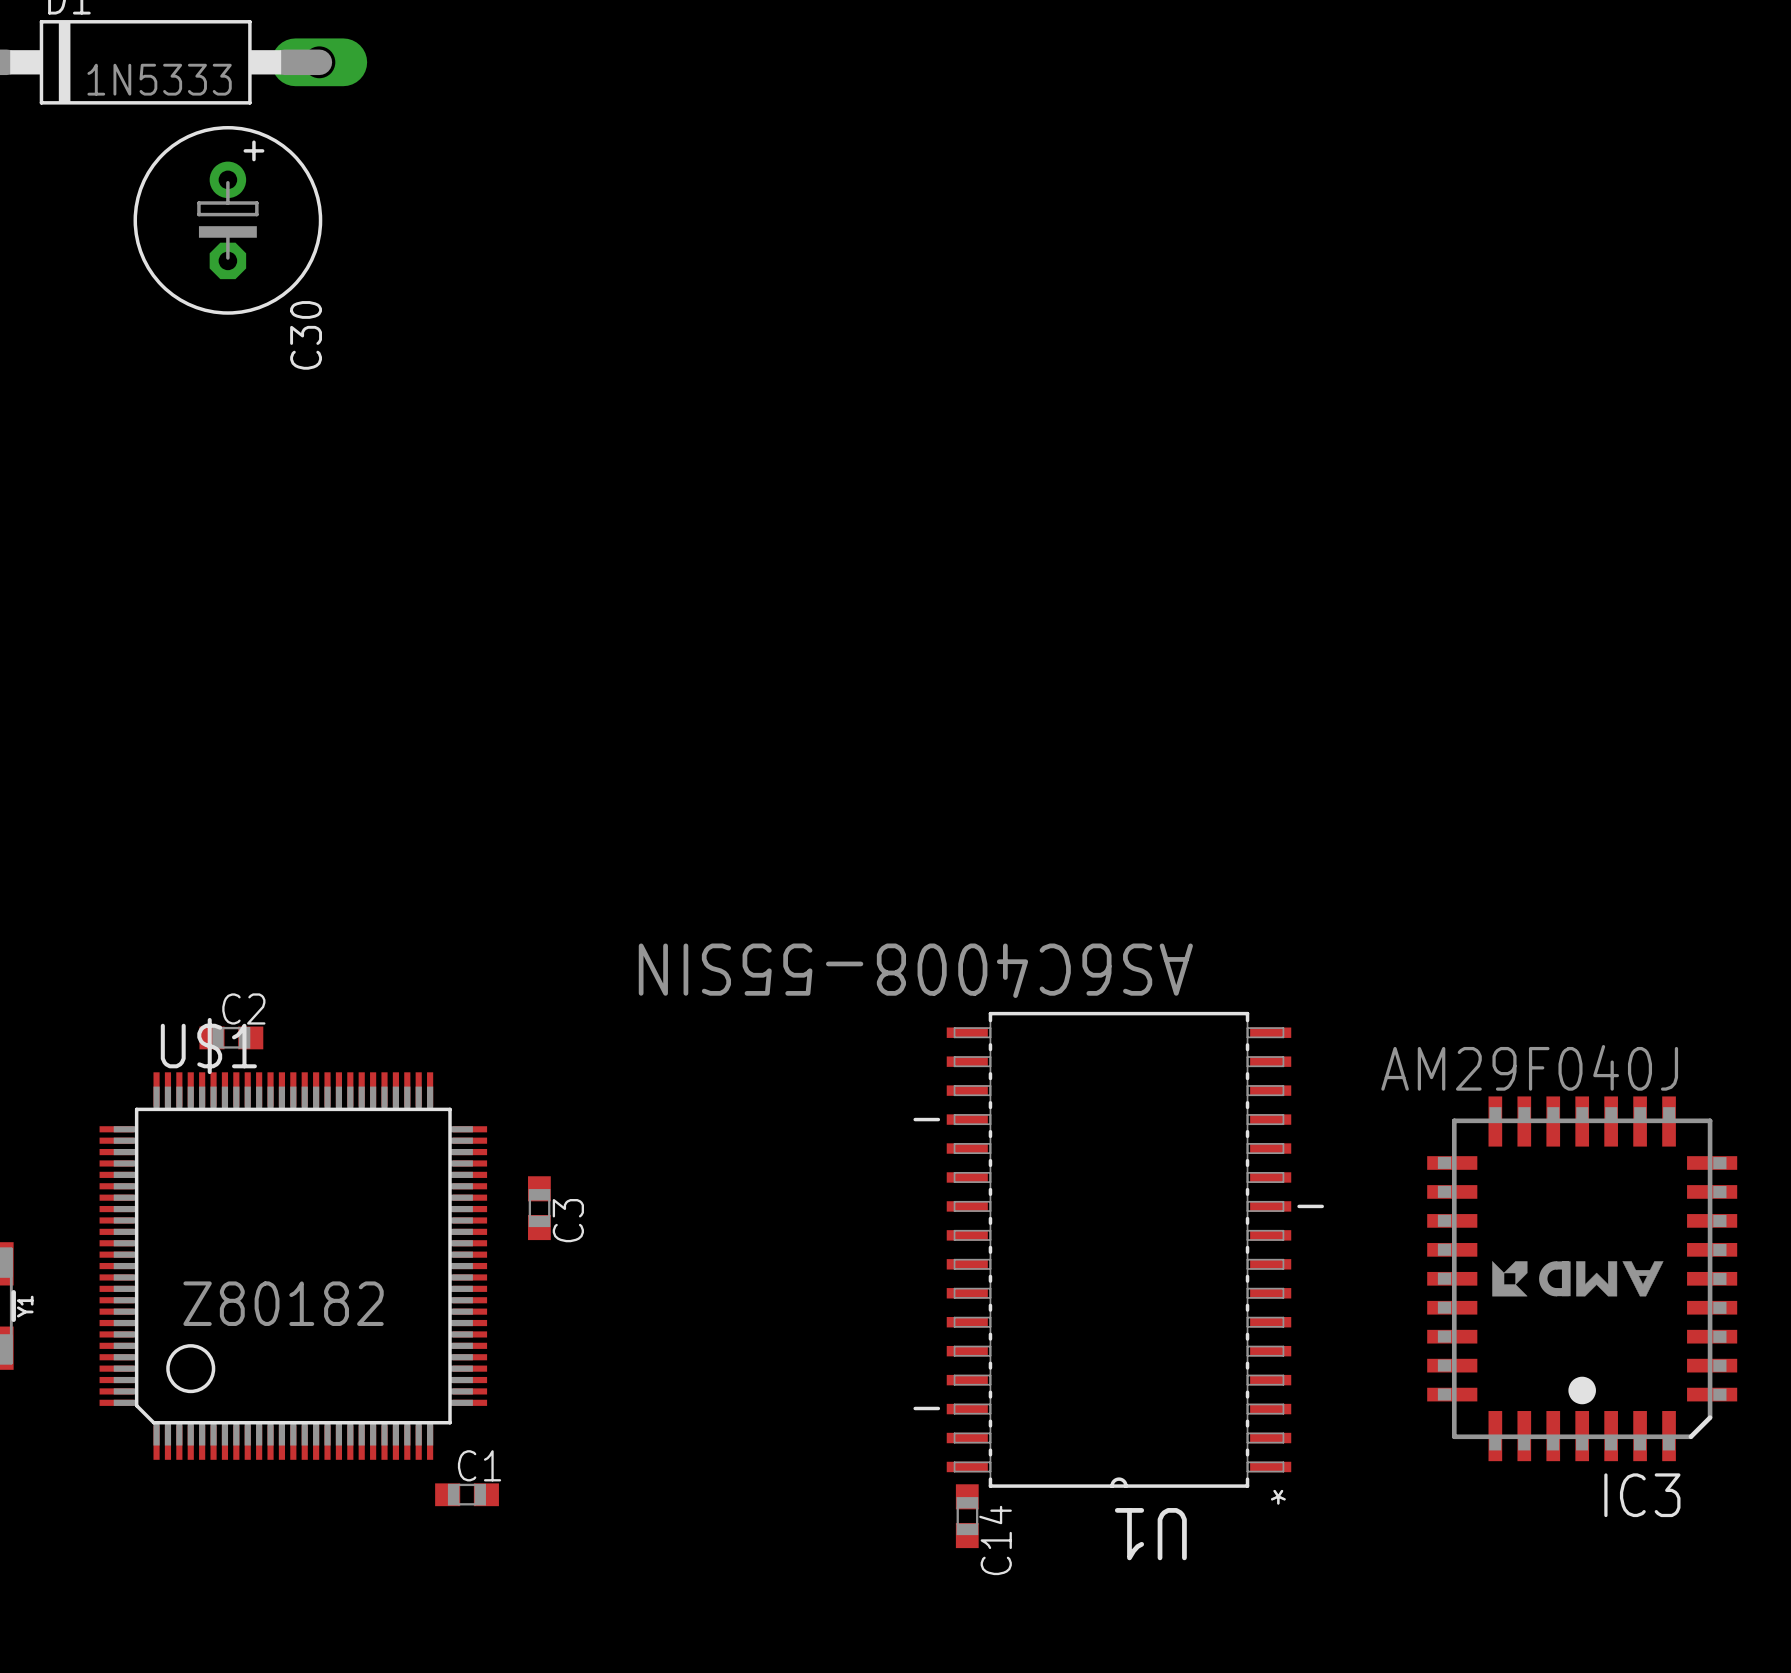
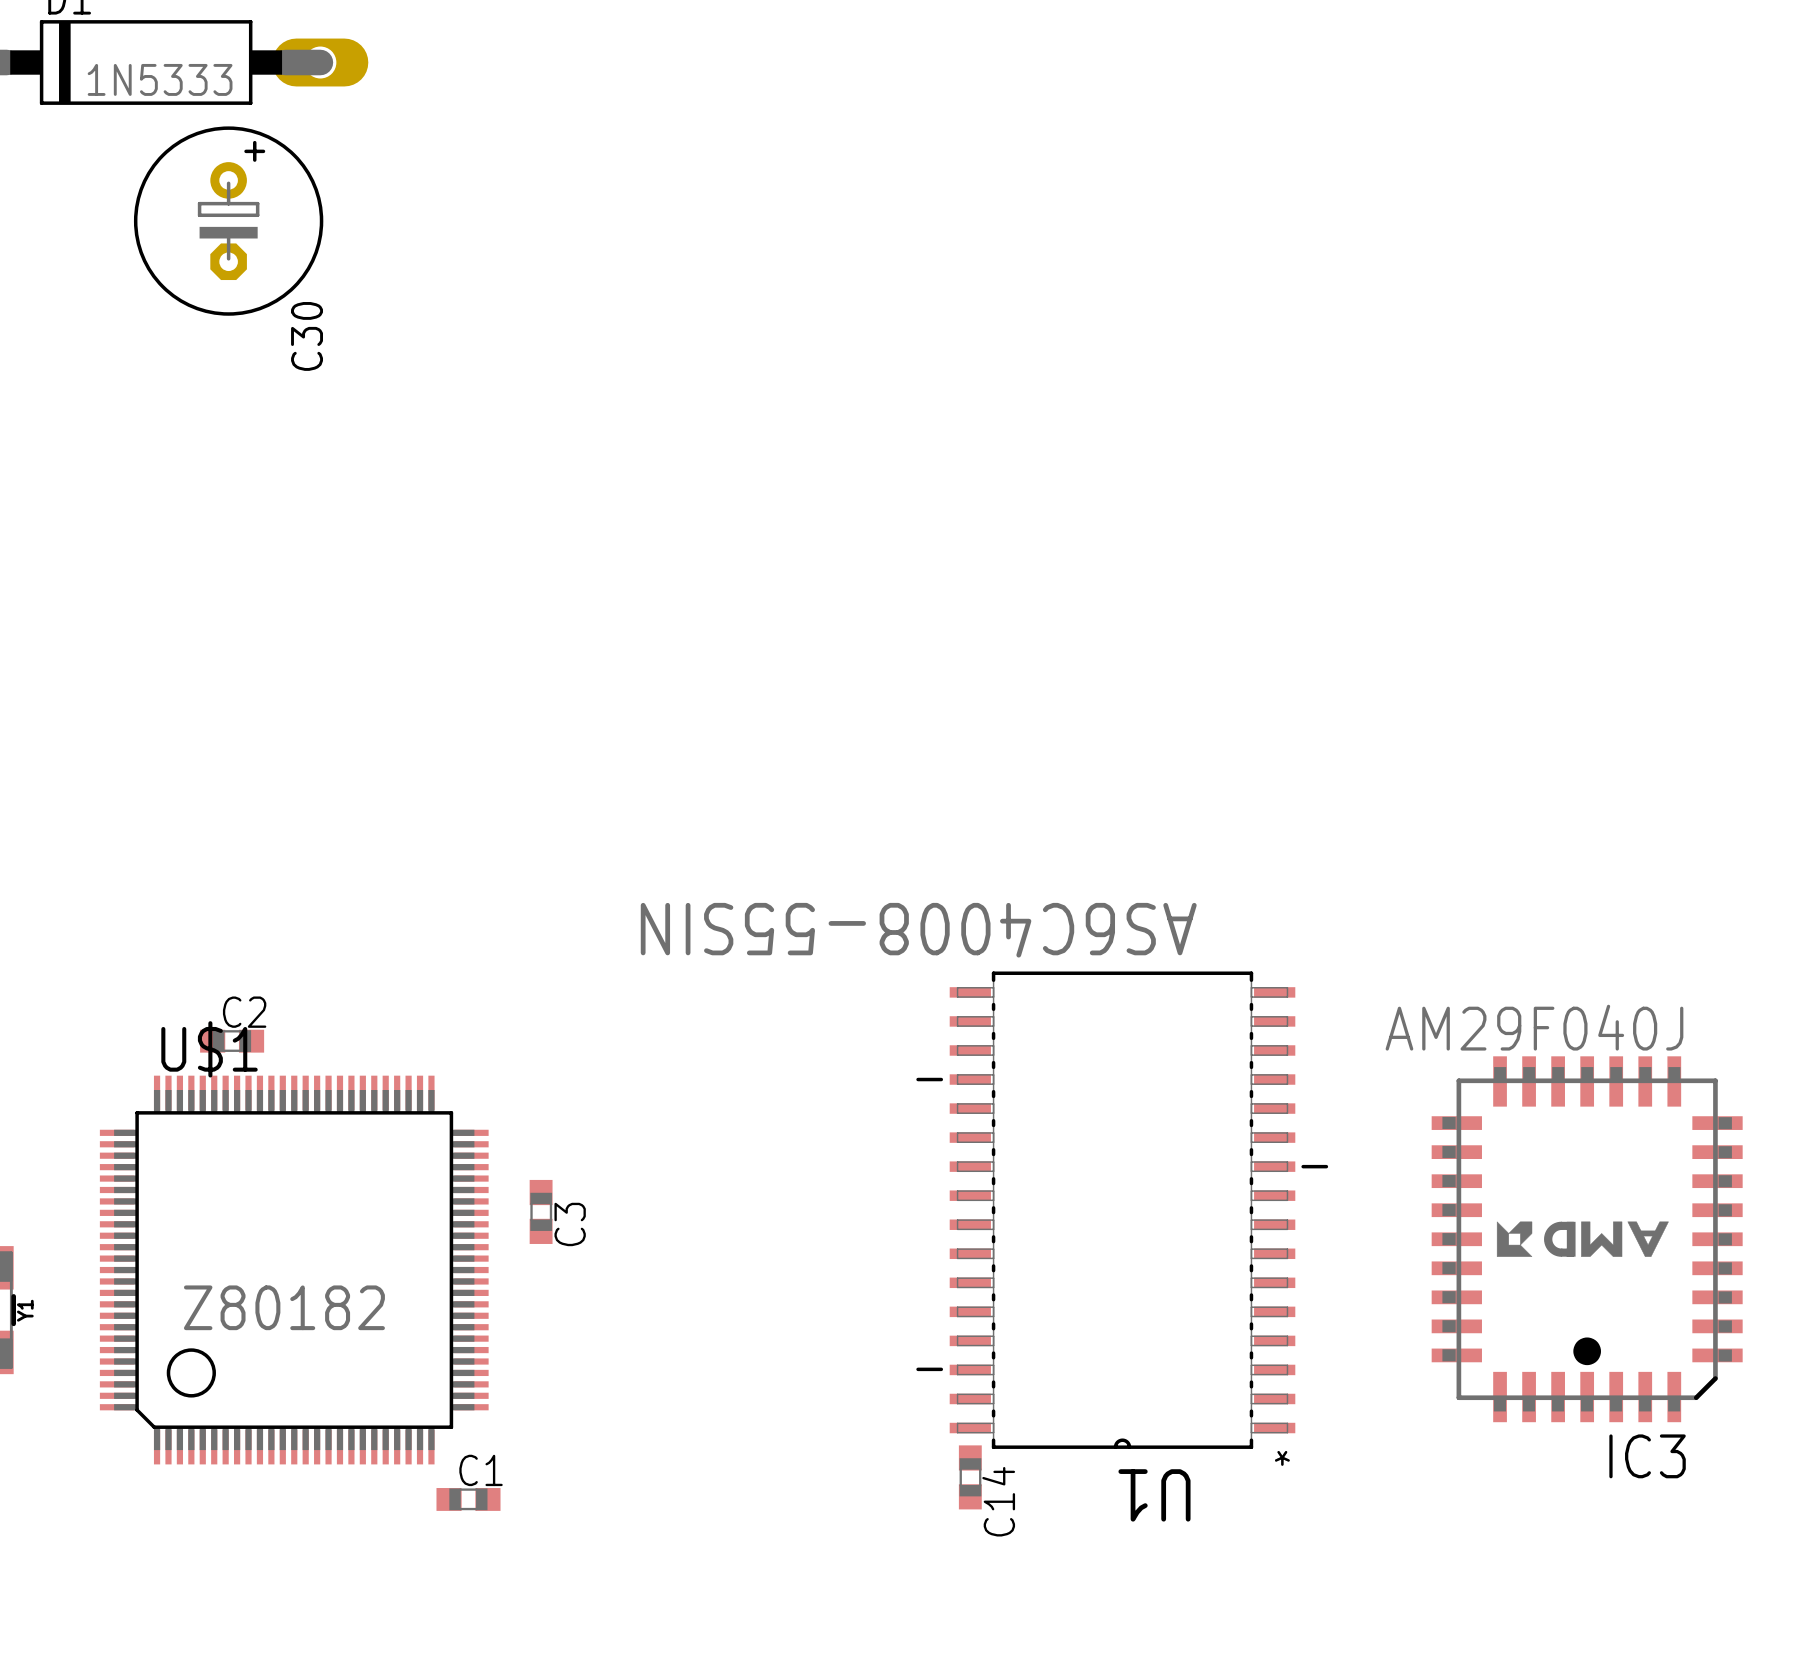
U1 position: (1118, 1249) -> (1122, 1210)
IC3 position: (1582, 1278) -> (1587, 1239)
C14 position: (967, 1516) -> (970, 1477)

